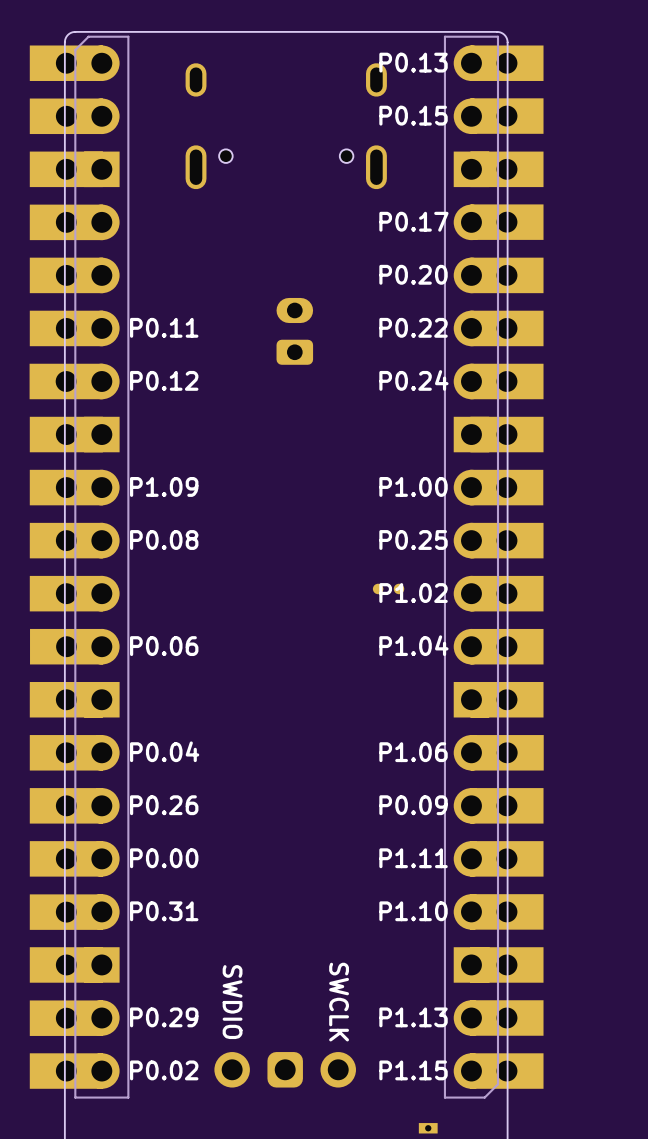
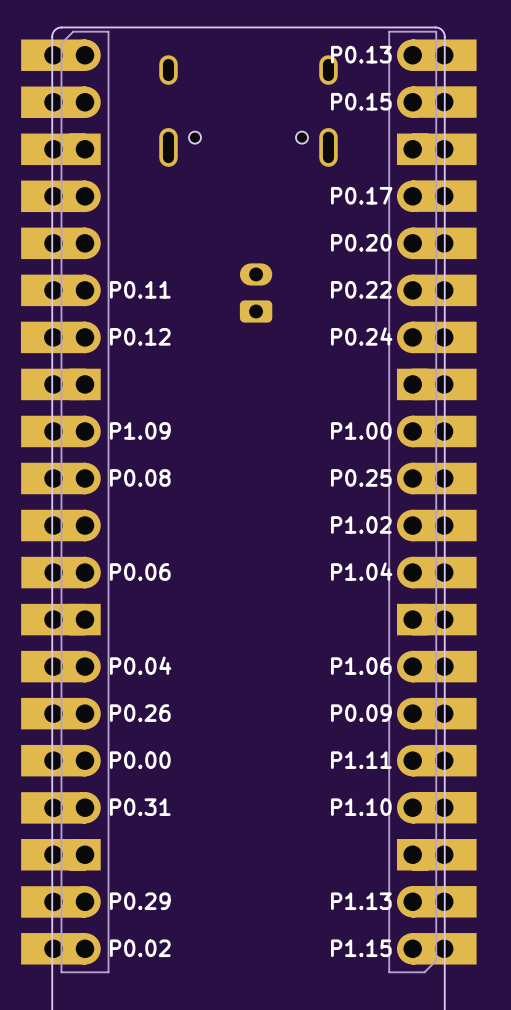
part: (388, 588) -> none
text: SWDIO (232, 1002) -> none
text: SWCLK (339, 1002) -> none
part: (285, 1069) -> none
part: (428, 1128) -> none

